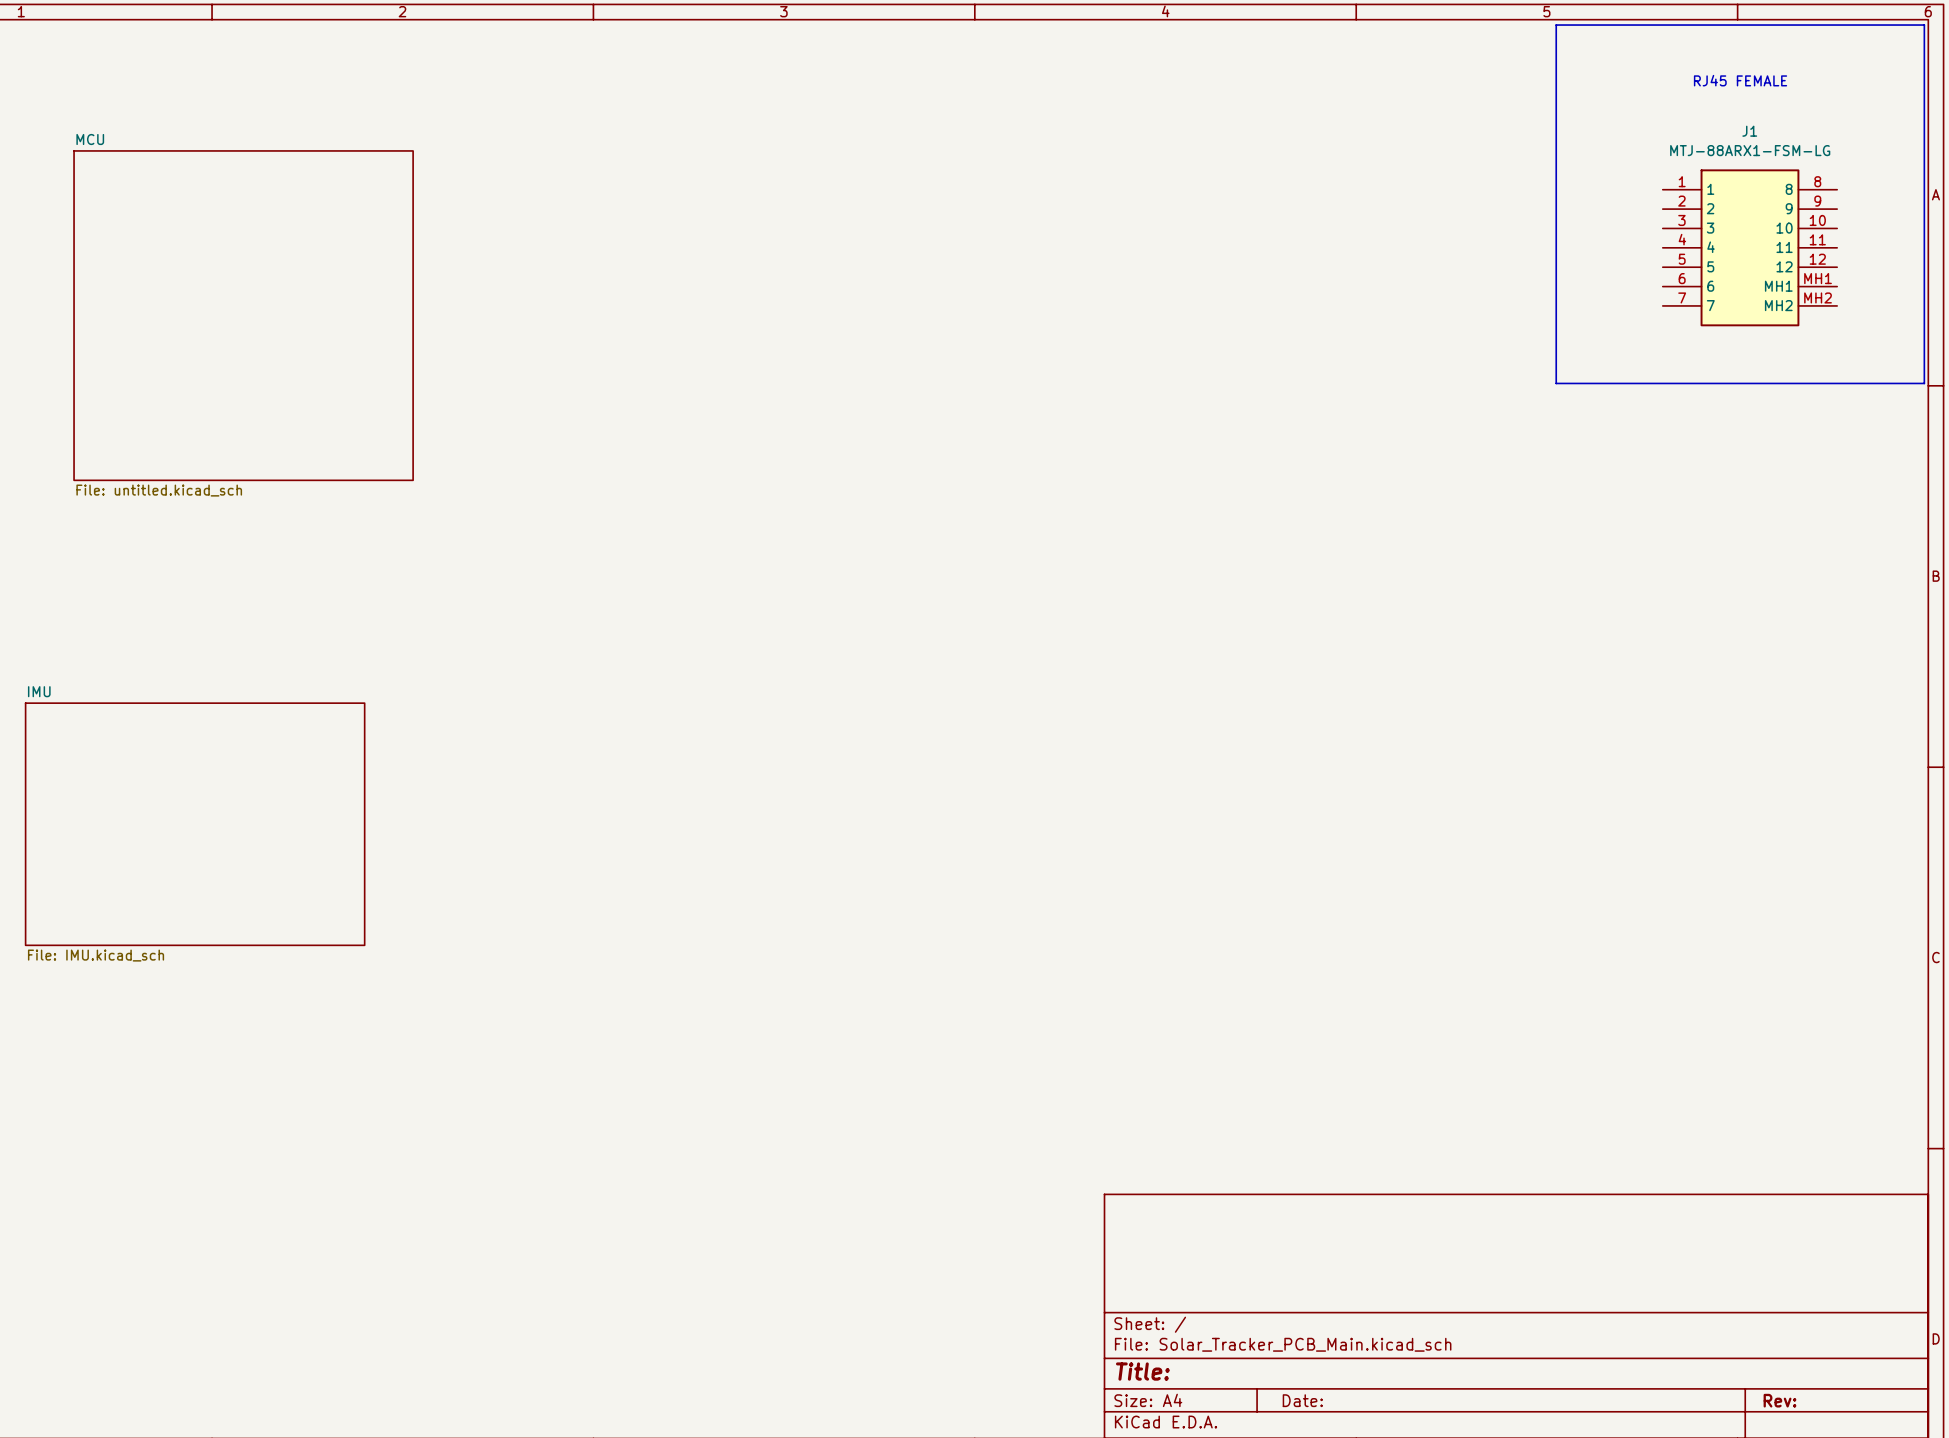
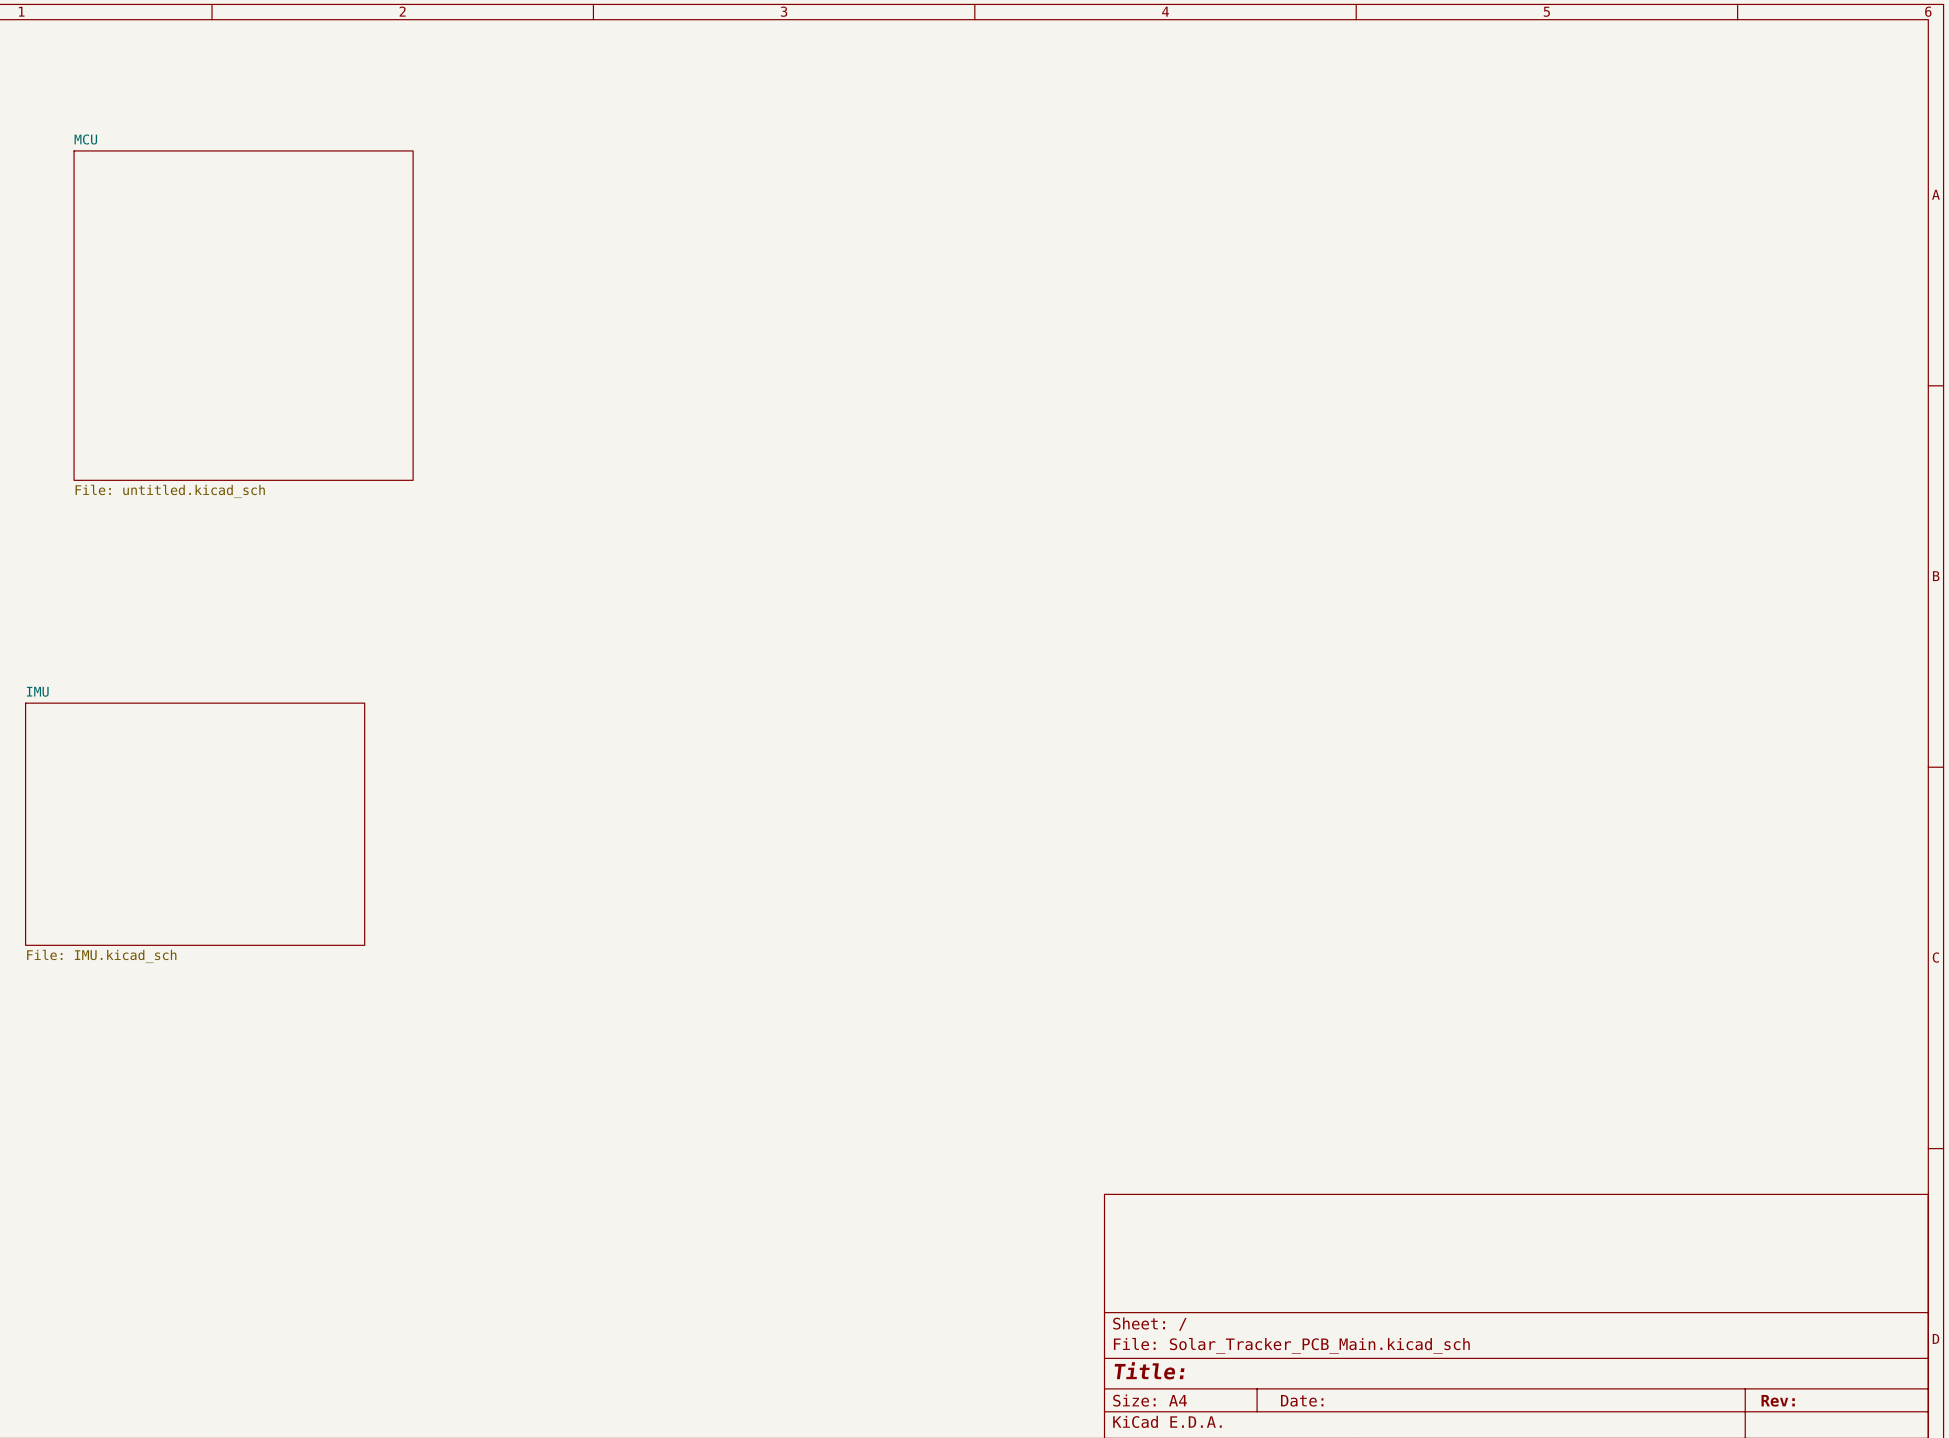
line: (1556, 25) (1924, 25) (1924, 383) (1556, 383) (1556, 25) -> none
text: RJ45 FEMALE (1740, 80) -> none
J1: MTJ-88ARX1-FSM-LG (1749, 247) -> none

